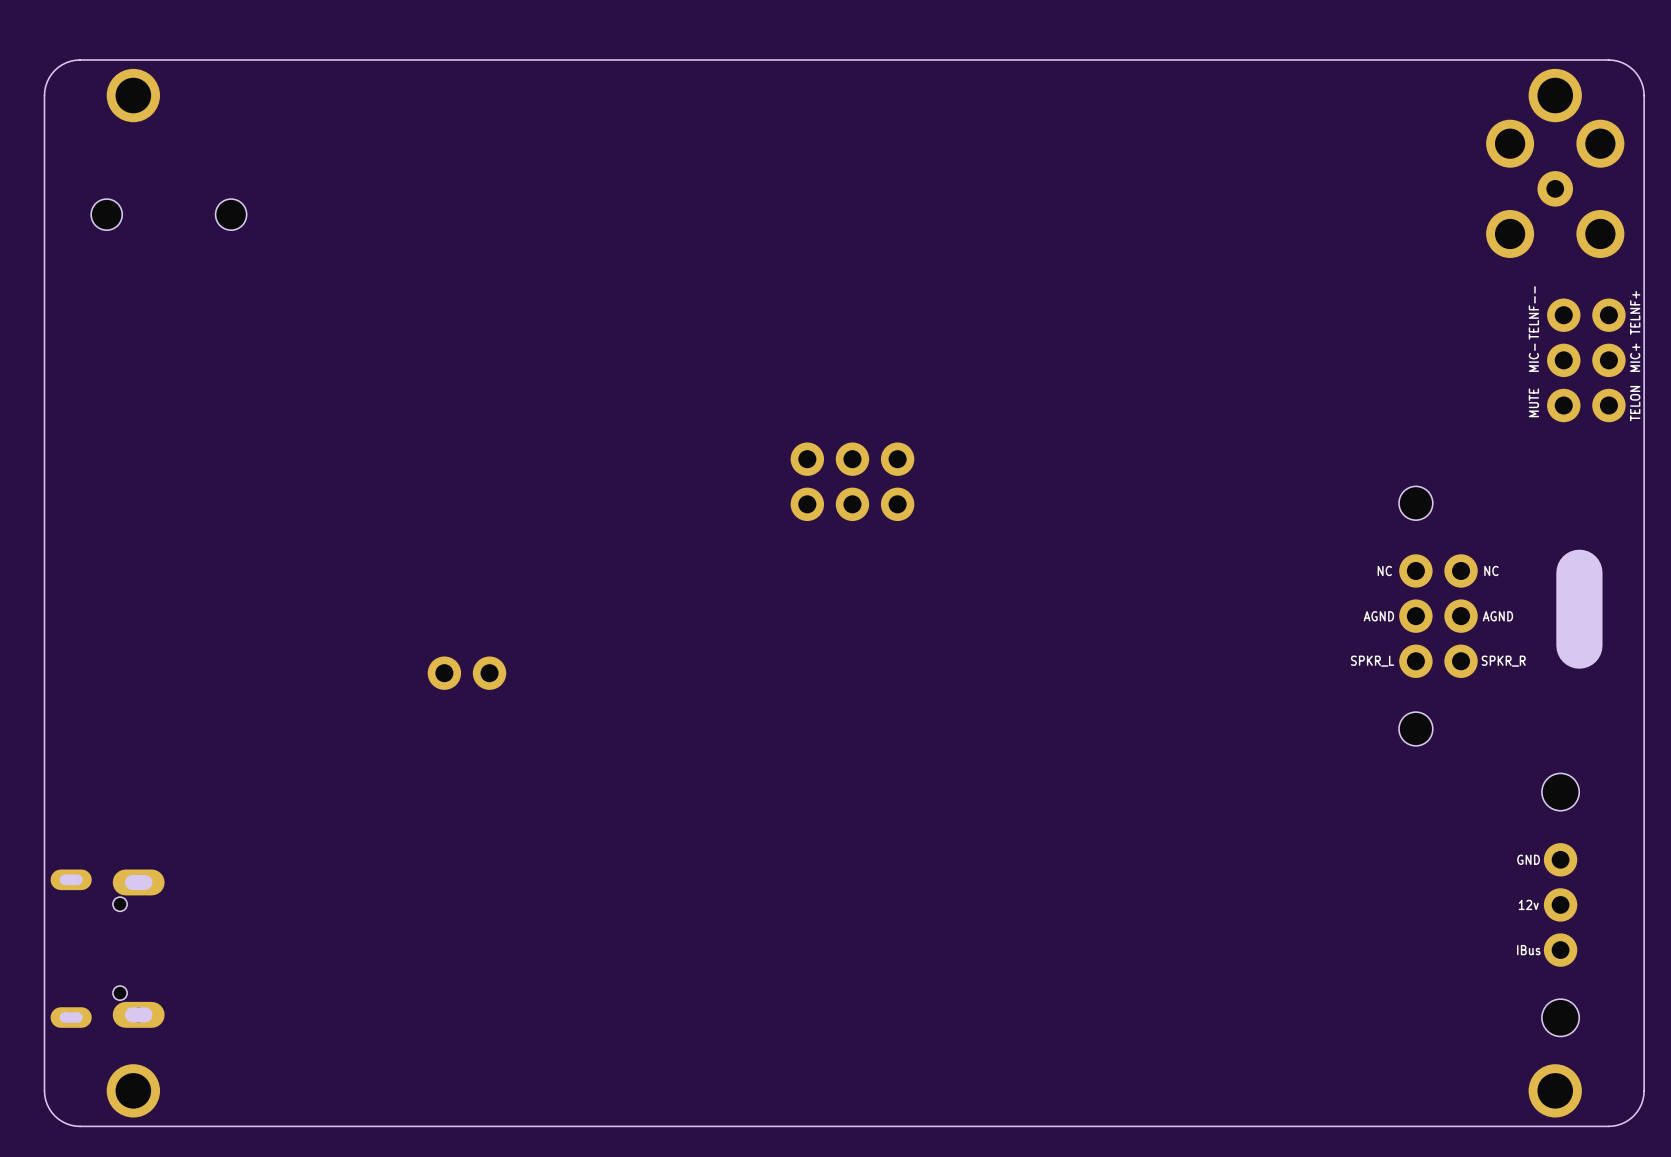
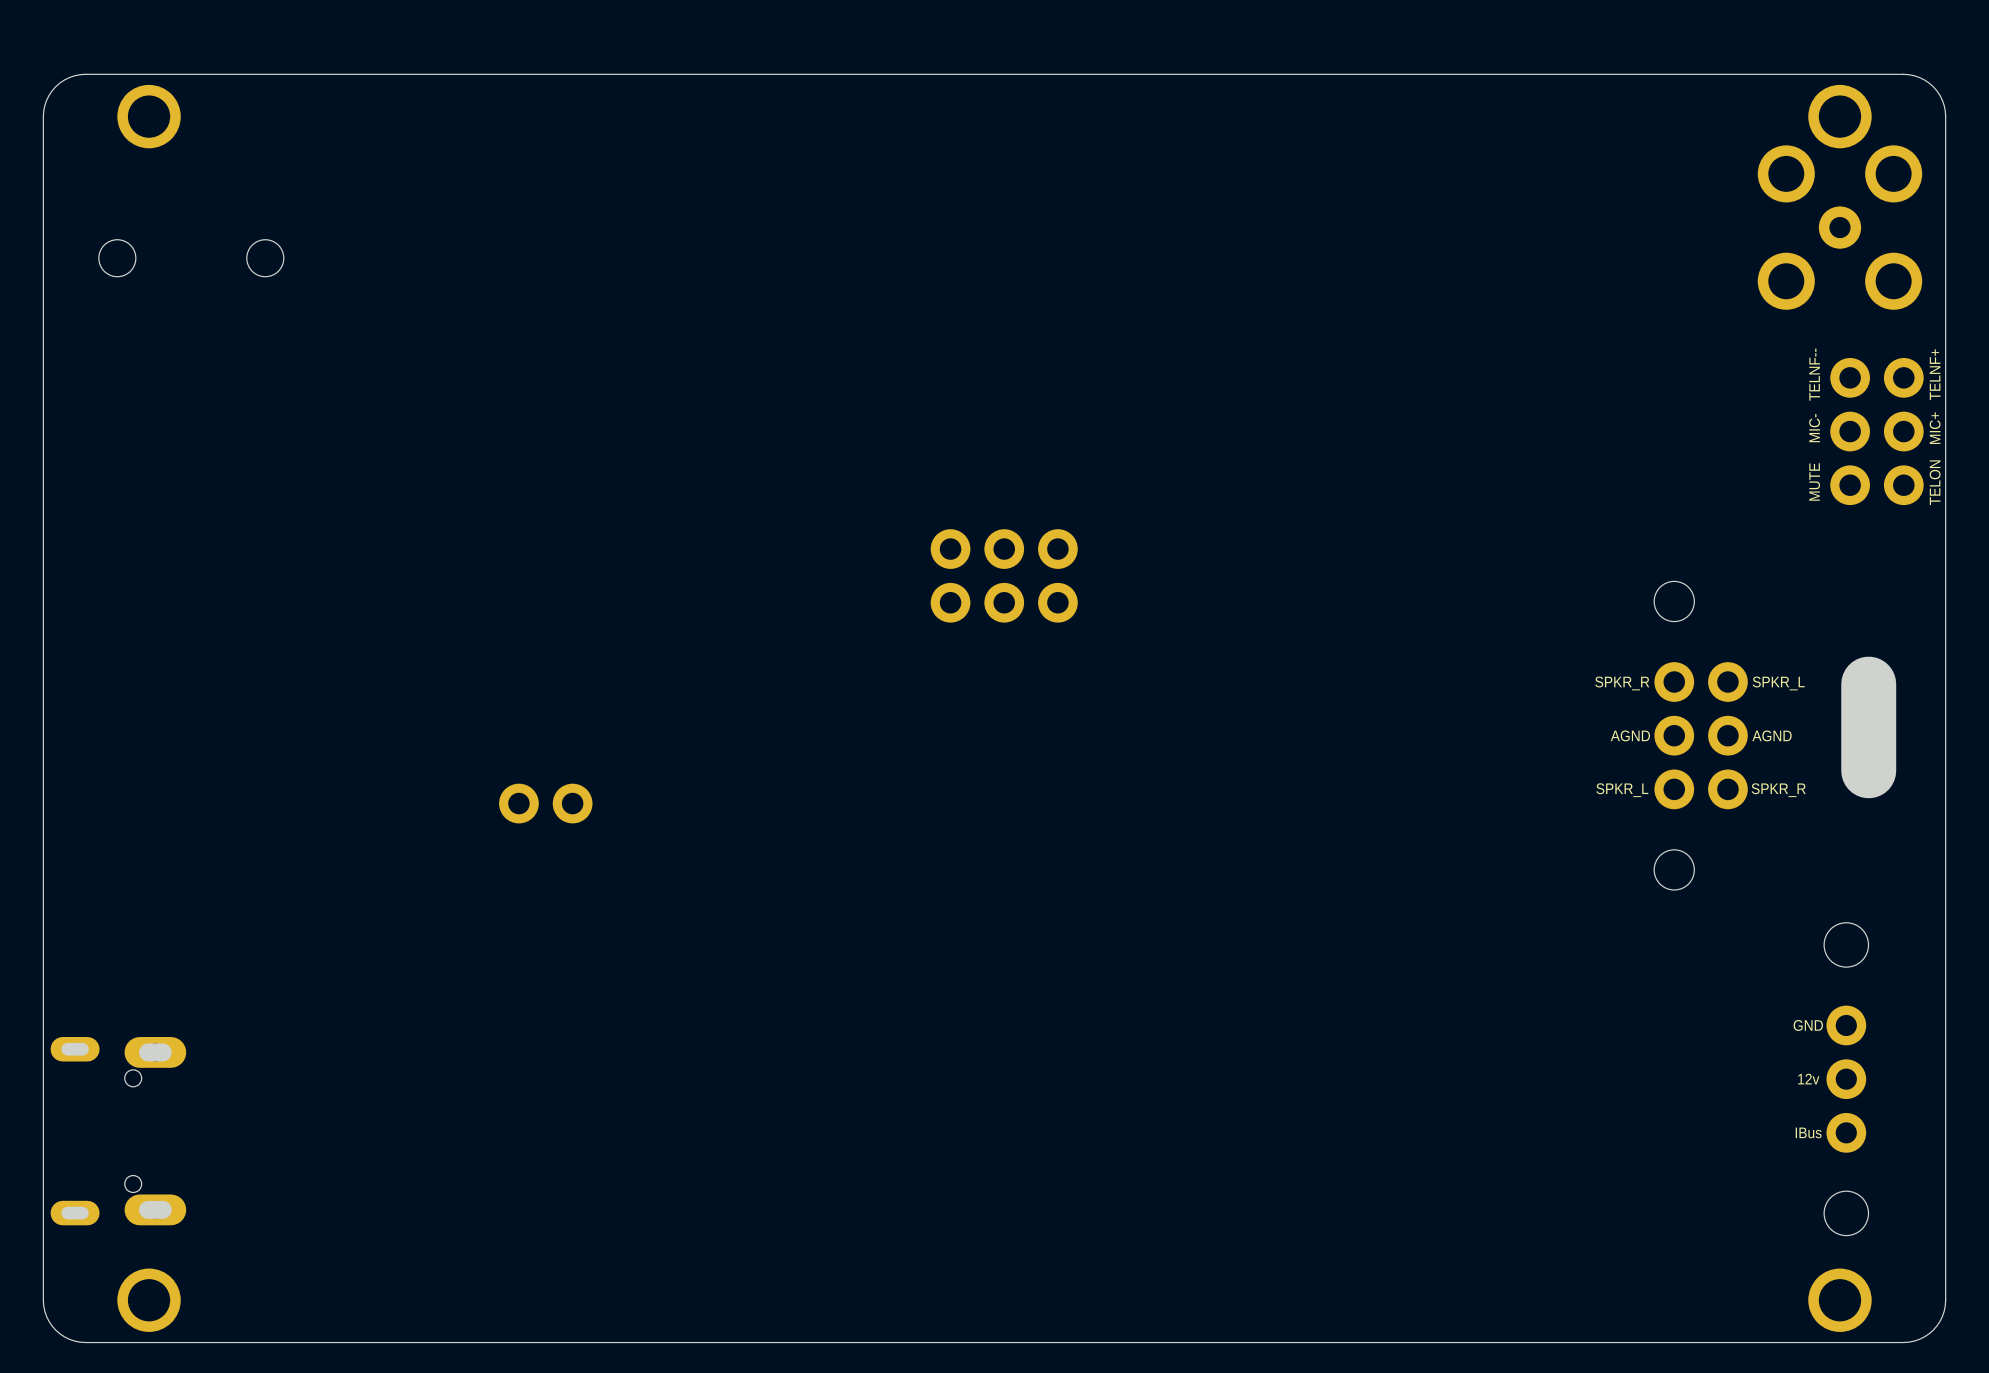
text: NC (1384, 570) -> SPKR_R (1622, 683)
text: NC (1491, 570) -> SPKR_L (1778, 683)

